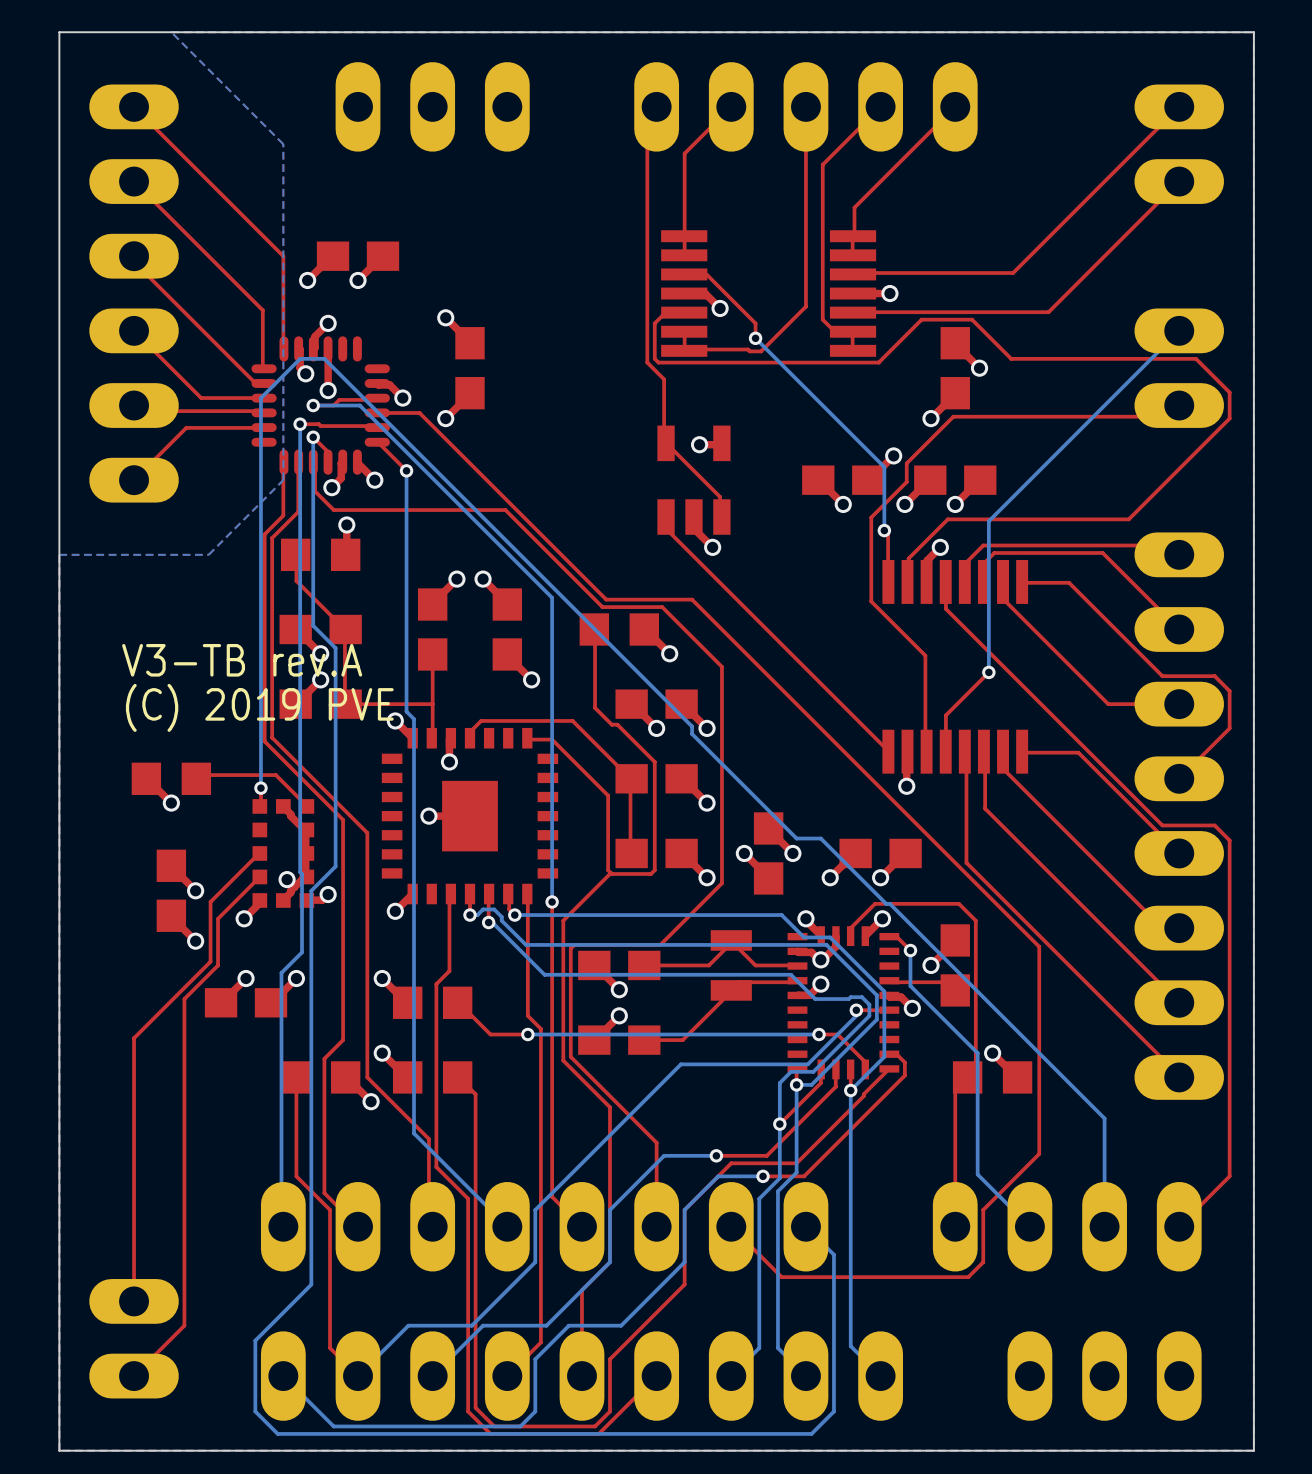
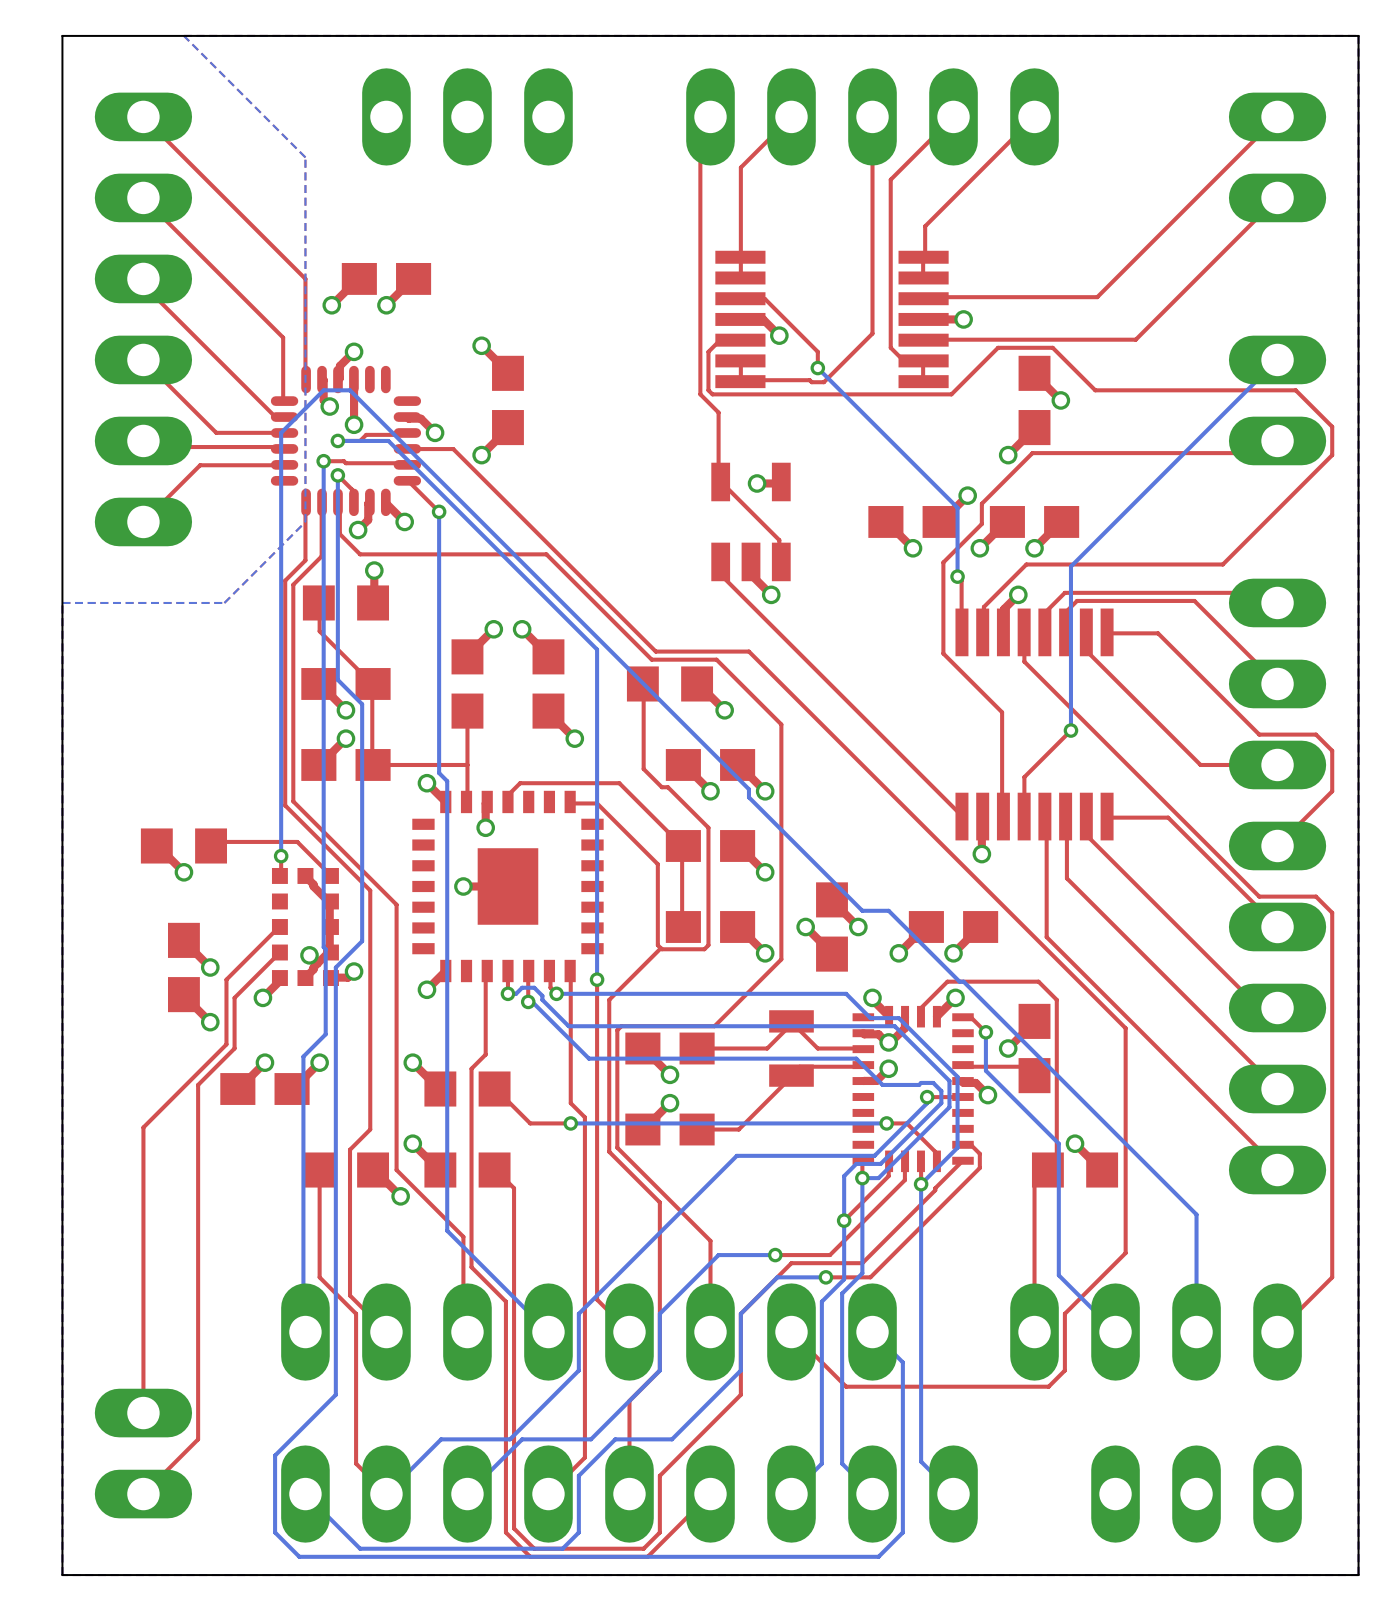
text: V3-TB rev.A (242, 660) -> none
text: (C) 2019 PVE (259, 707) -> none

